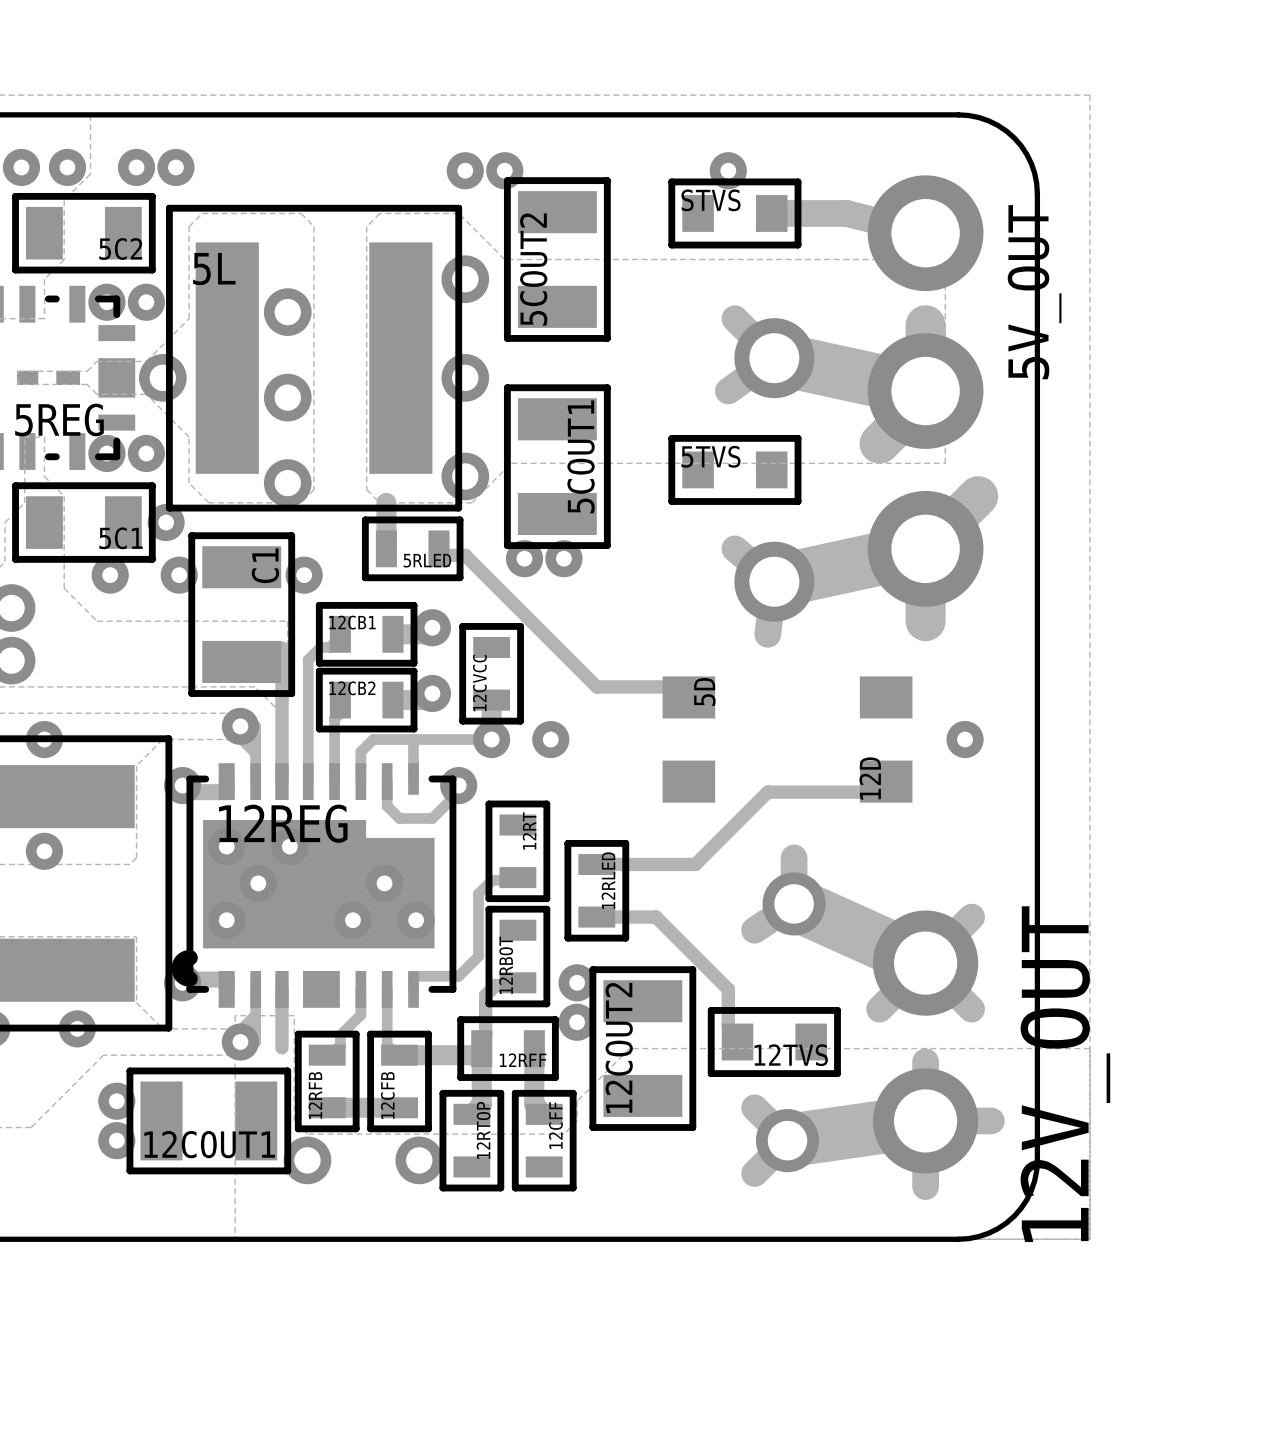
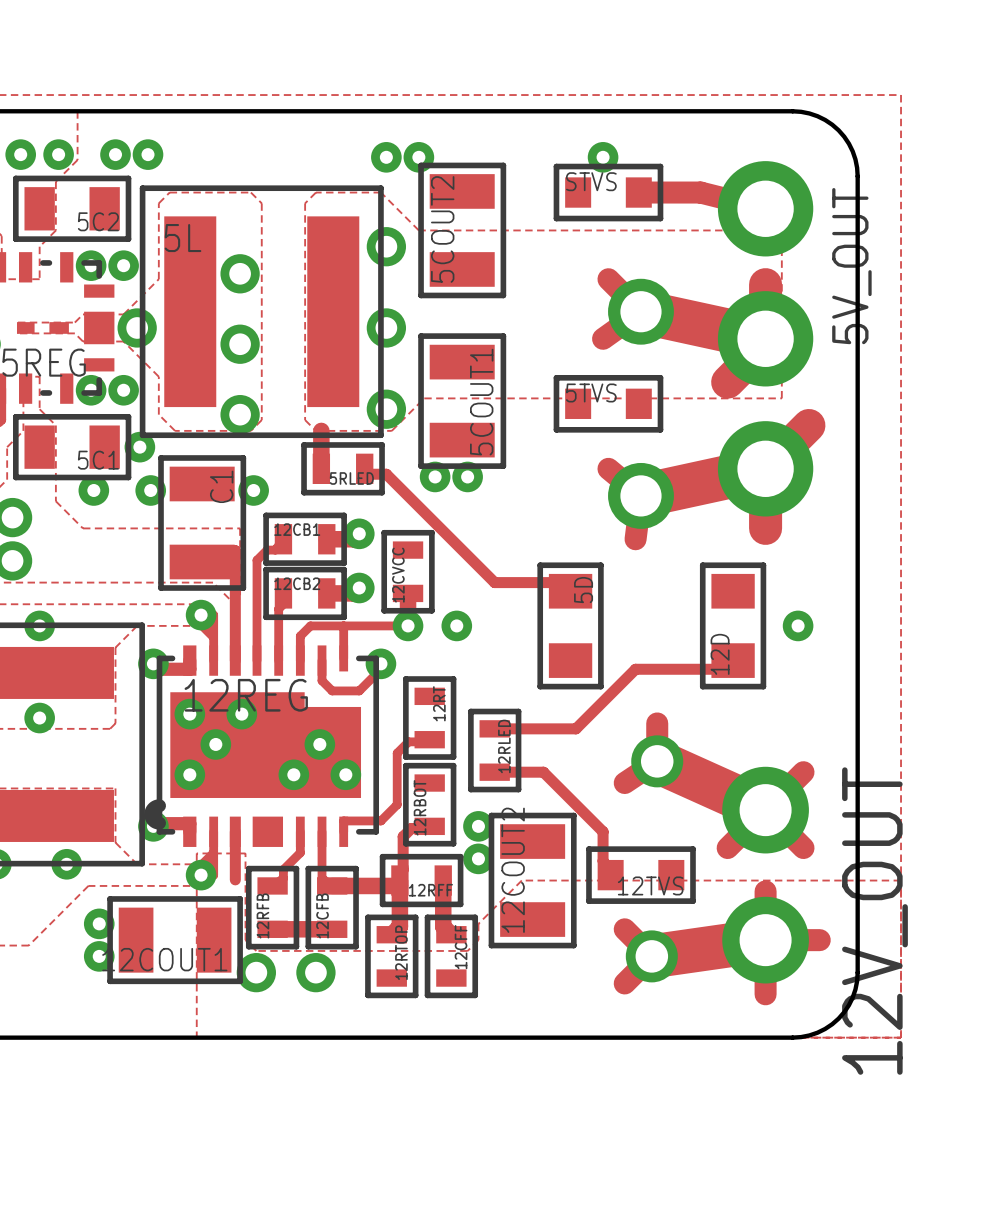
5D footprint: [662, 676, 716, 803] -> [537, 562, 604, 690]
12D footprint: [859, 676, 913, 803] -> [699, 562, 767, 690]
via position: (419, 1160) -> (315, 972)

